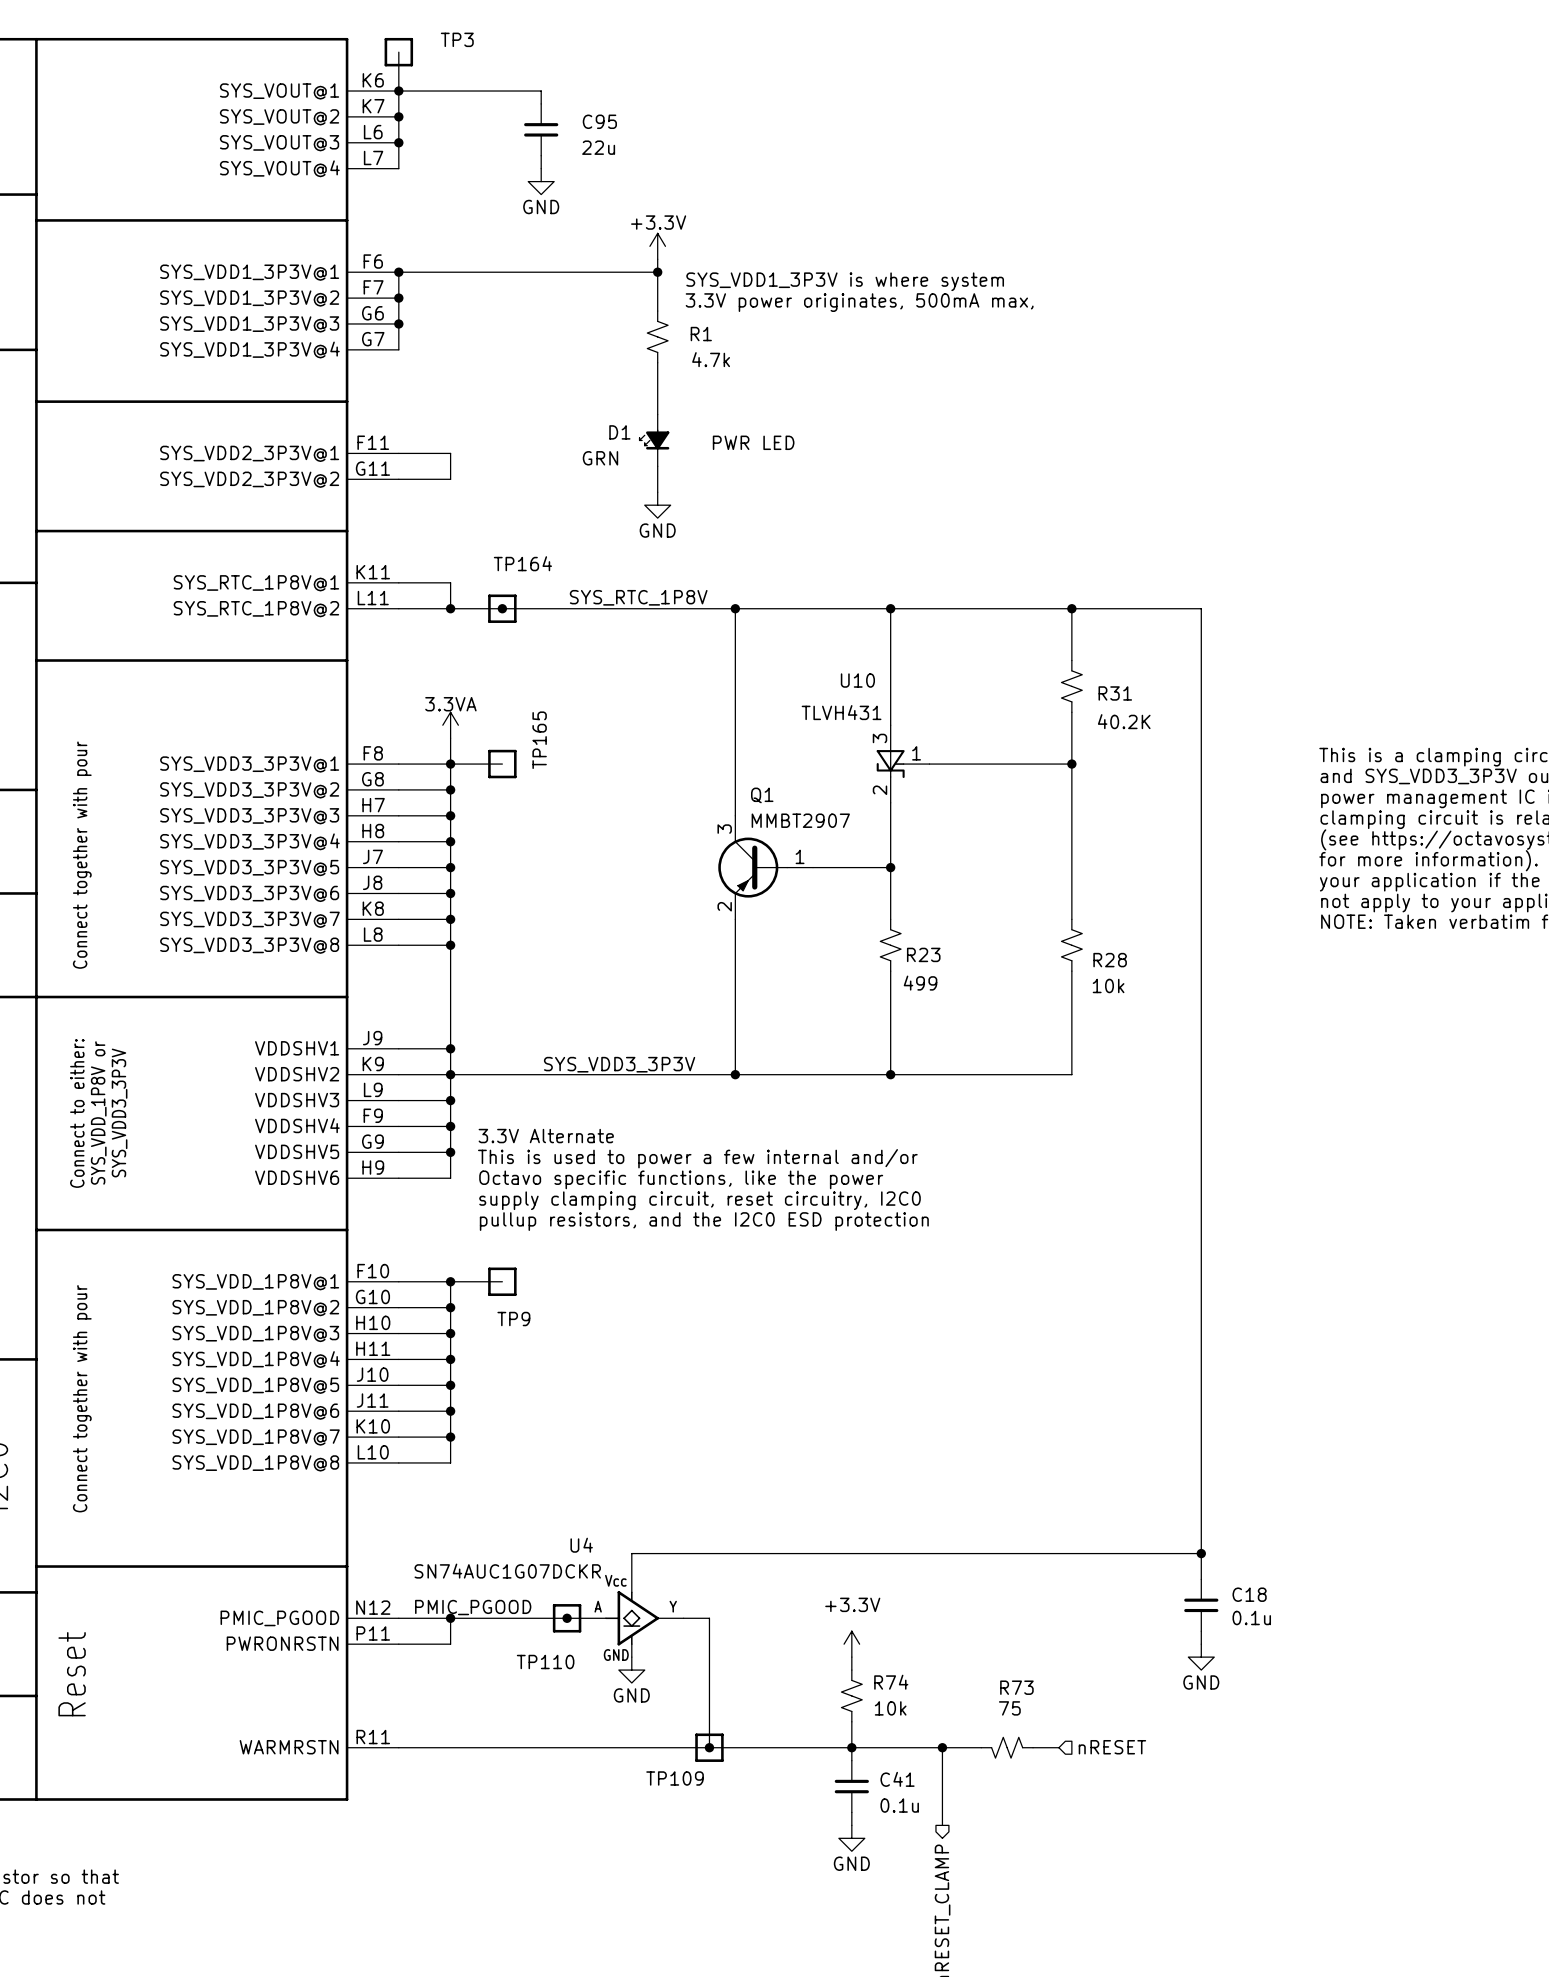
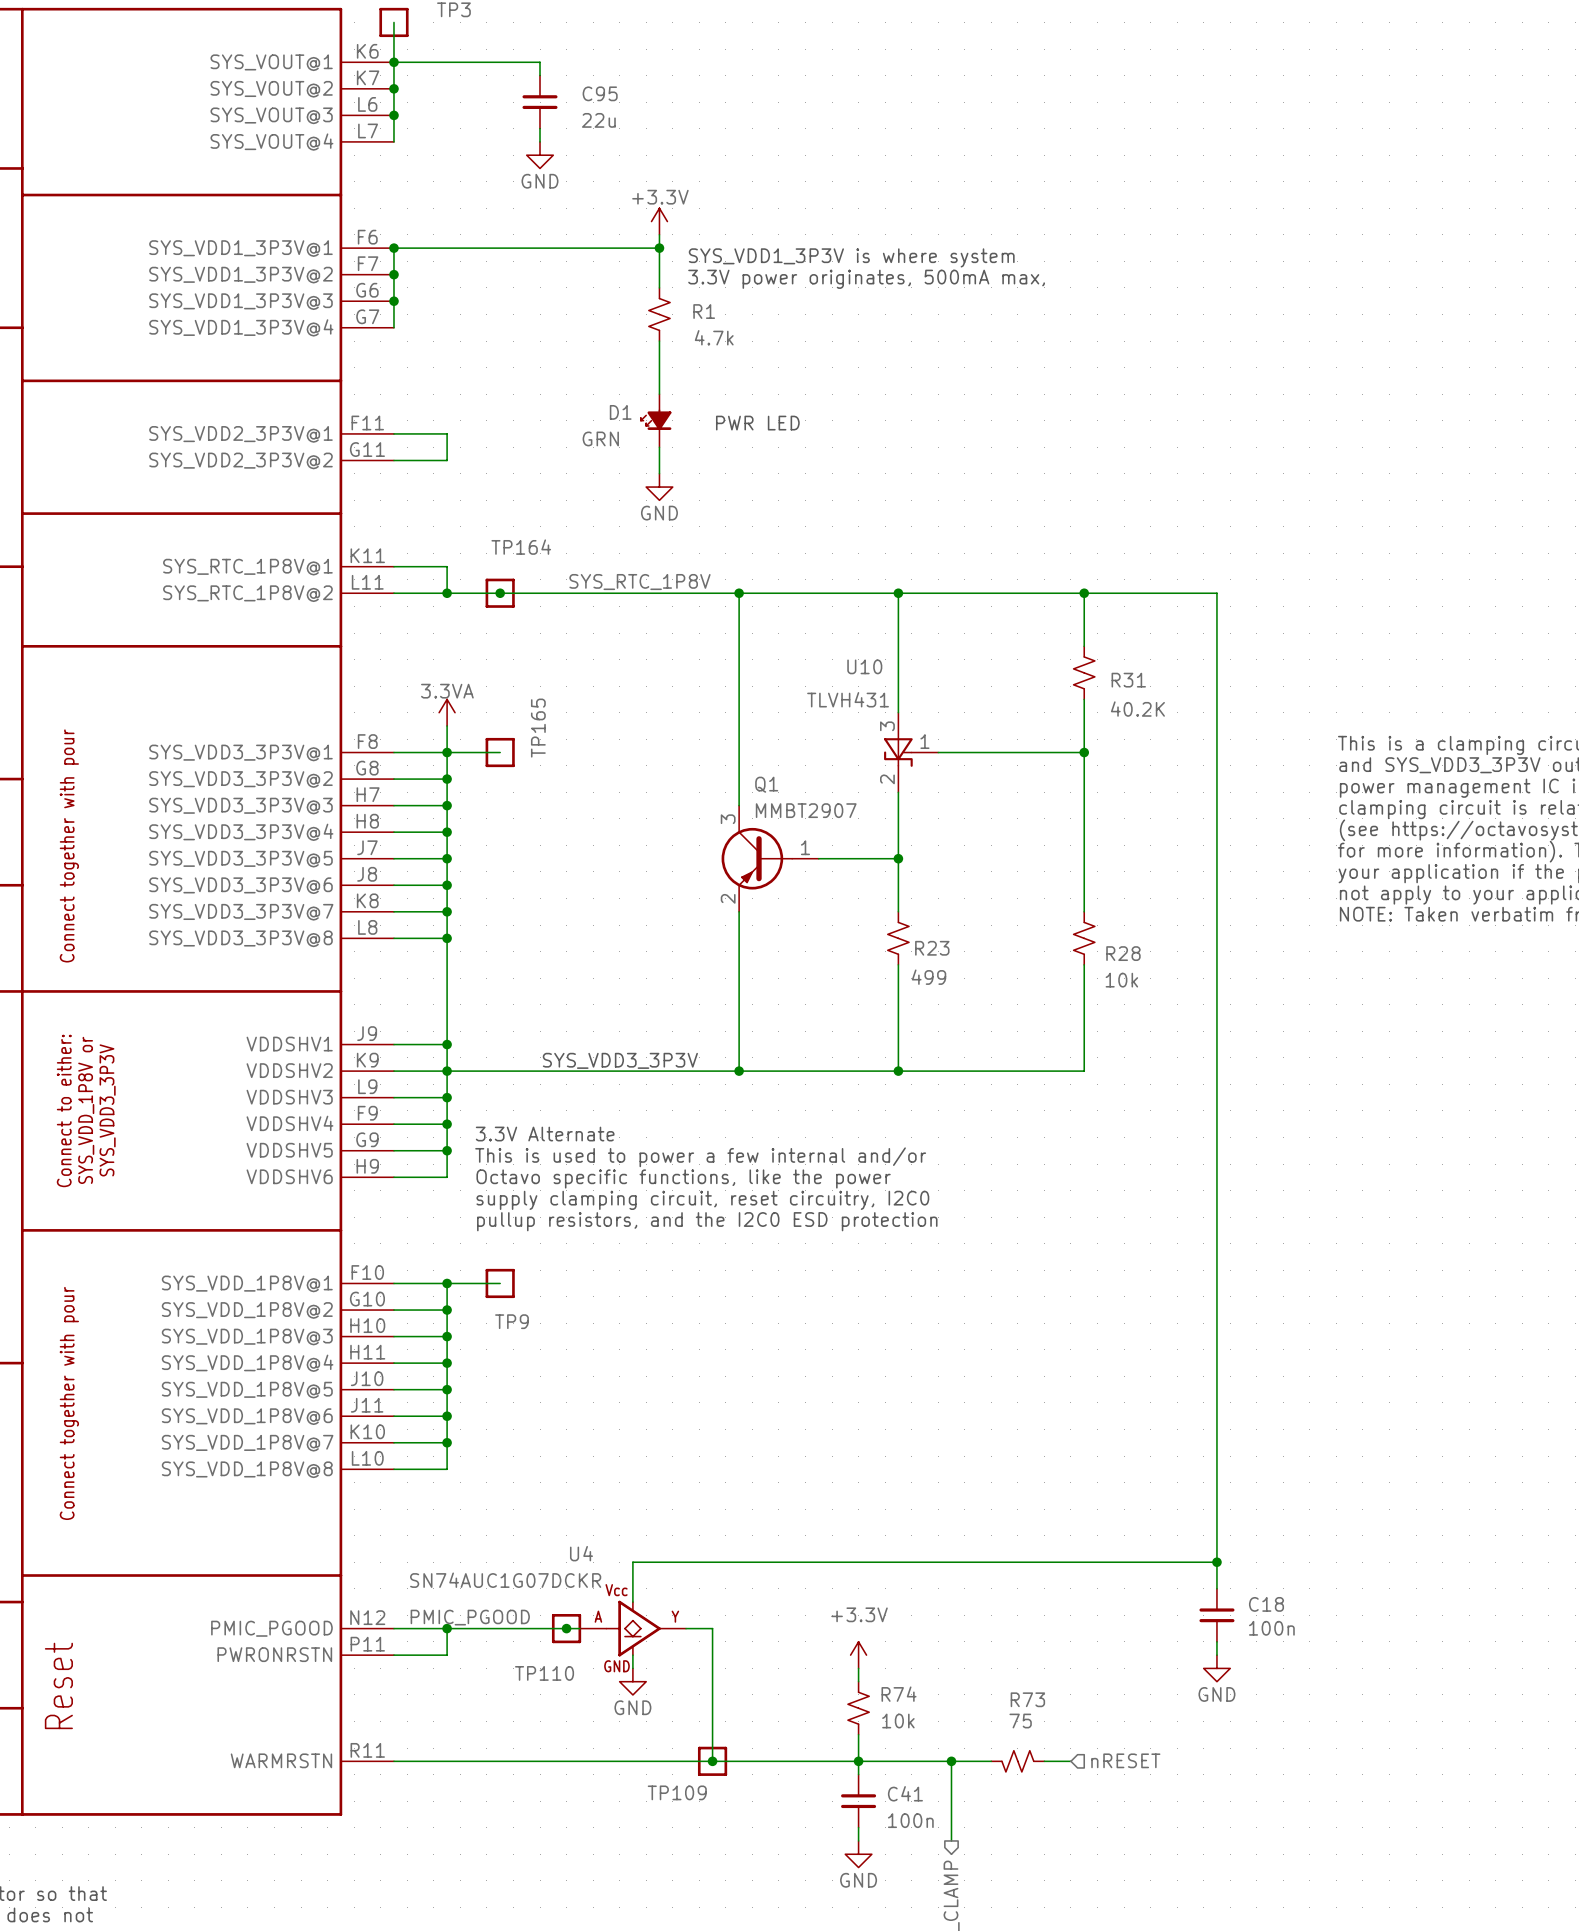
C18 value: 0.1u (1251, 1618) -> 100n (1271, 1628)
C41 value: 0.1u (899, 1805) -> 100n (910, 1820)

